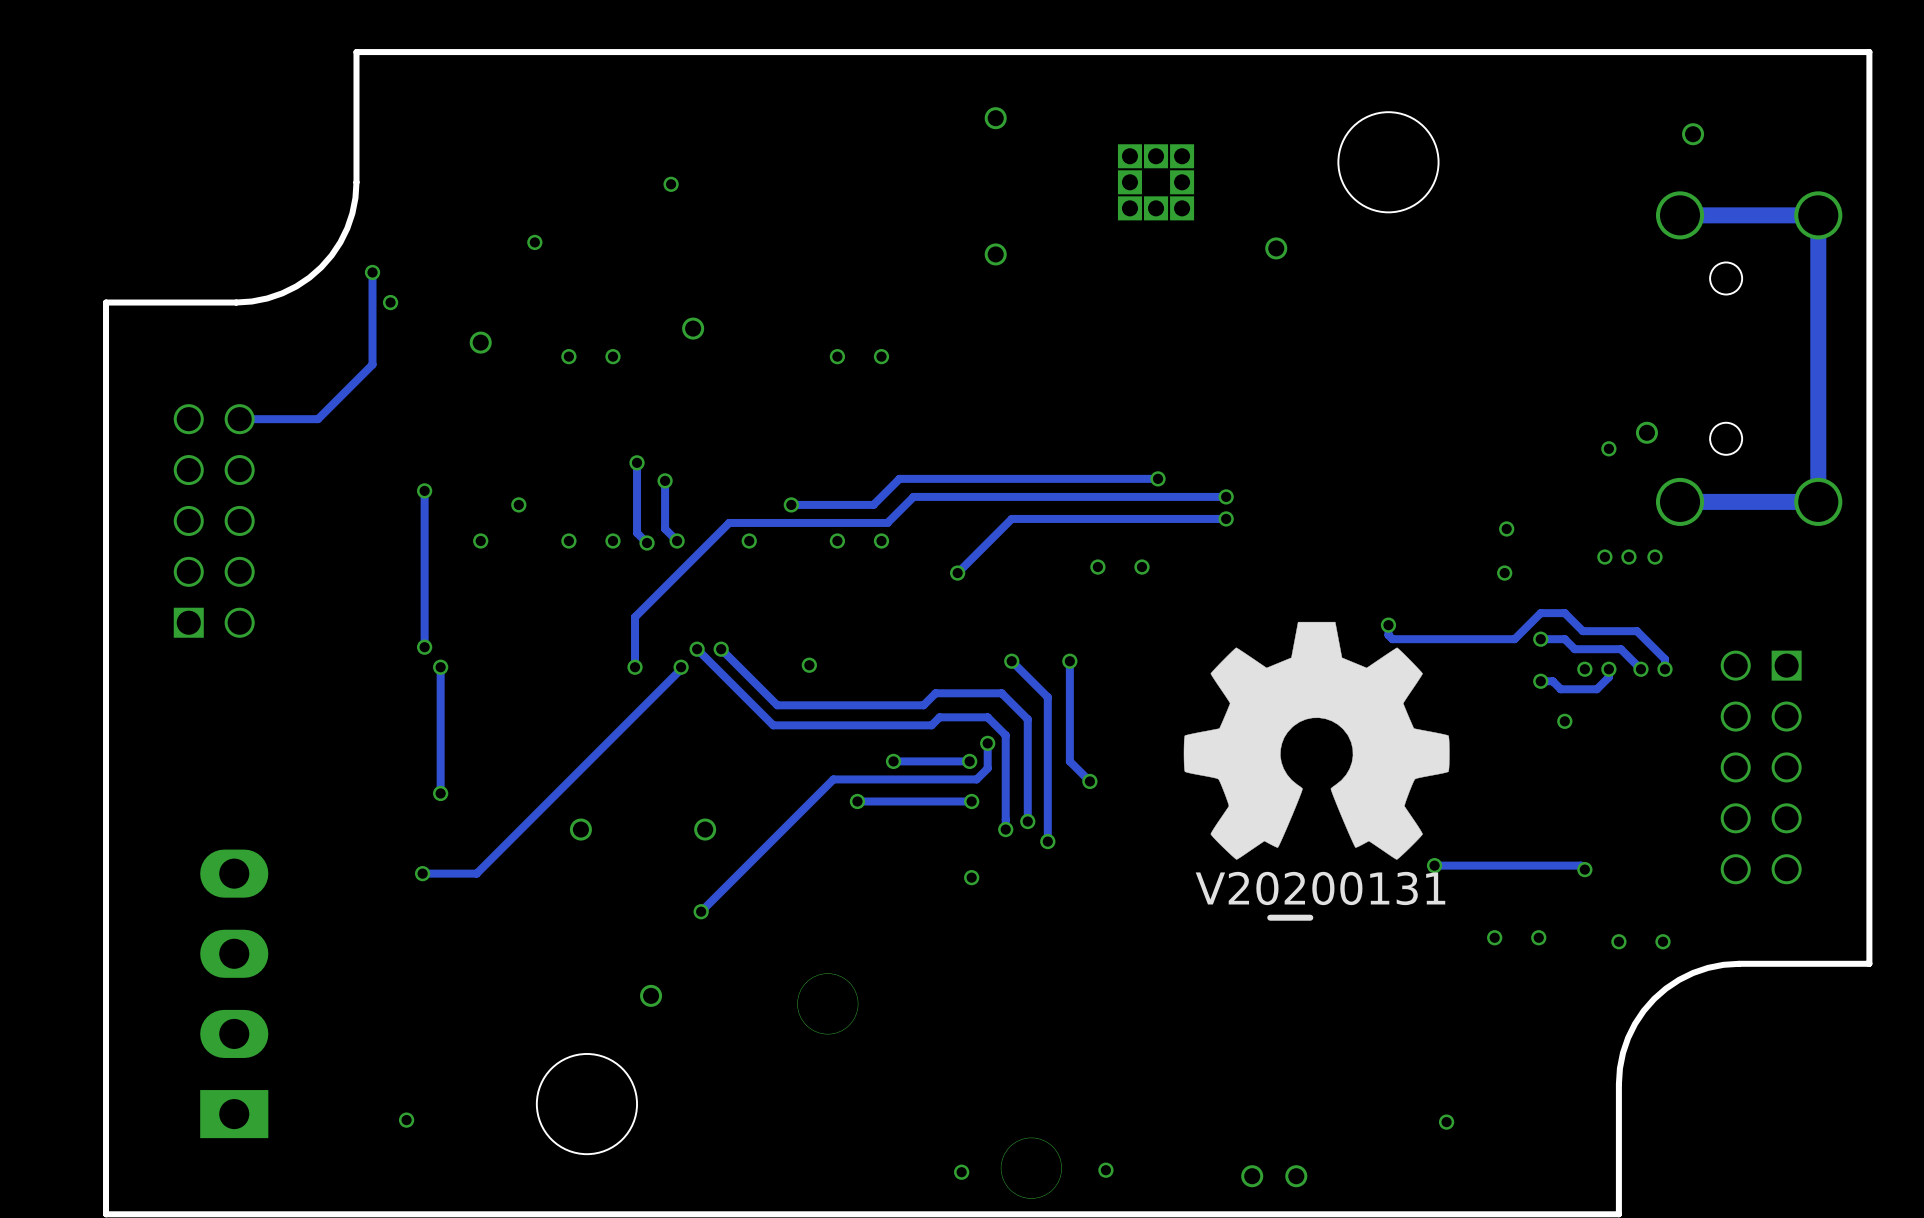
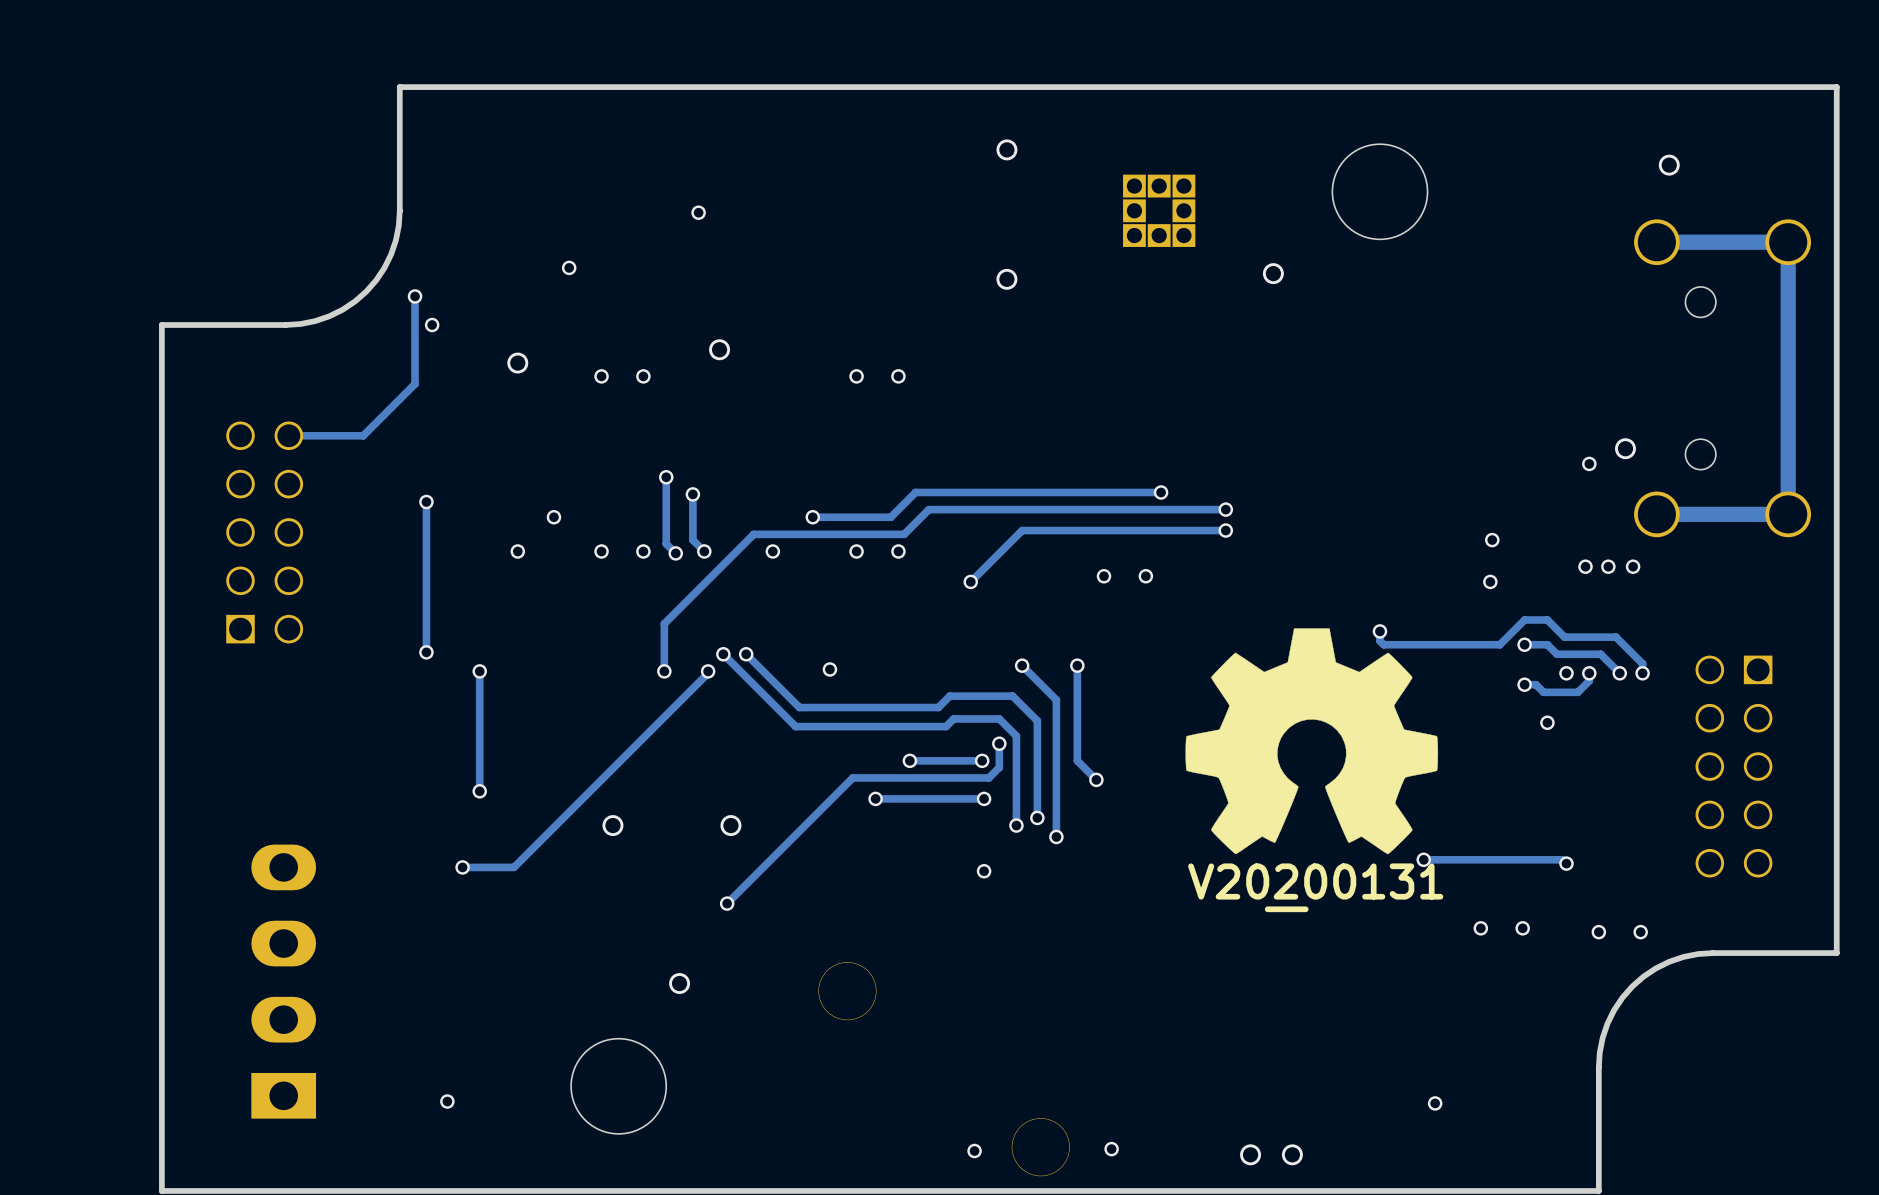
track: none -> (426, 502) (426, 652)
track: (424, 490) (424, 647) -> none
via position: (424, 490) -> (426, 502)
via position: (424, 647) -> (426, 652)

